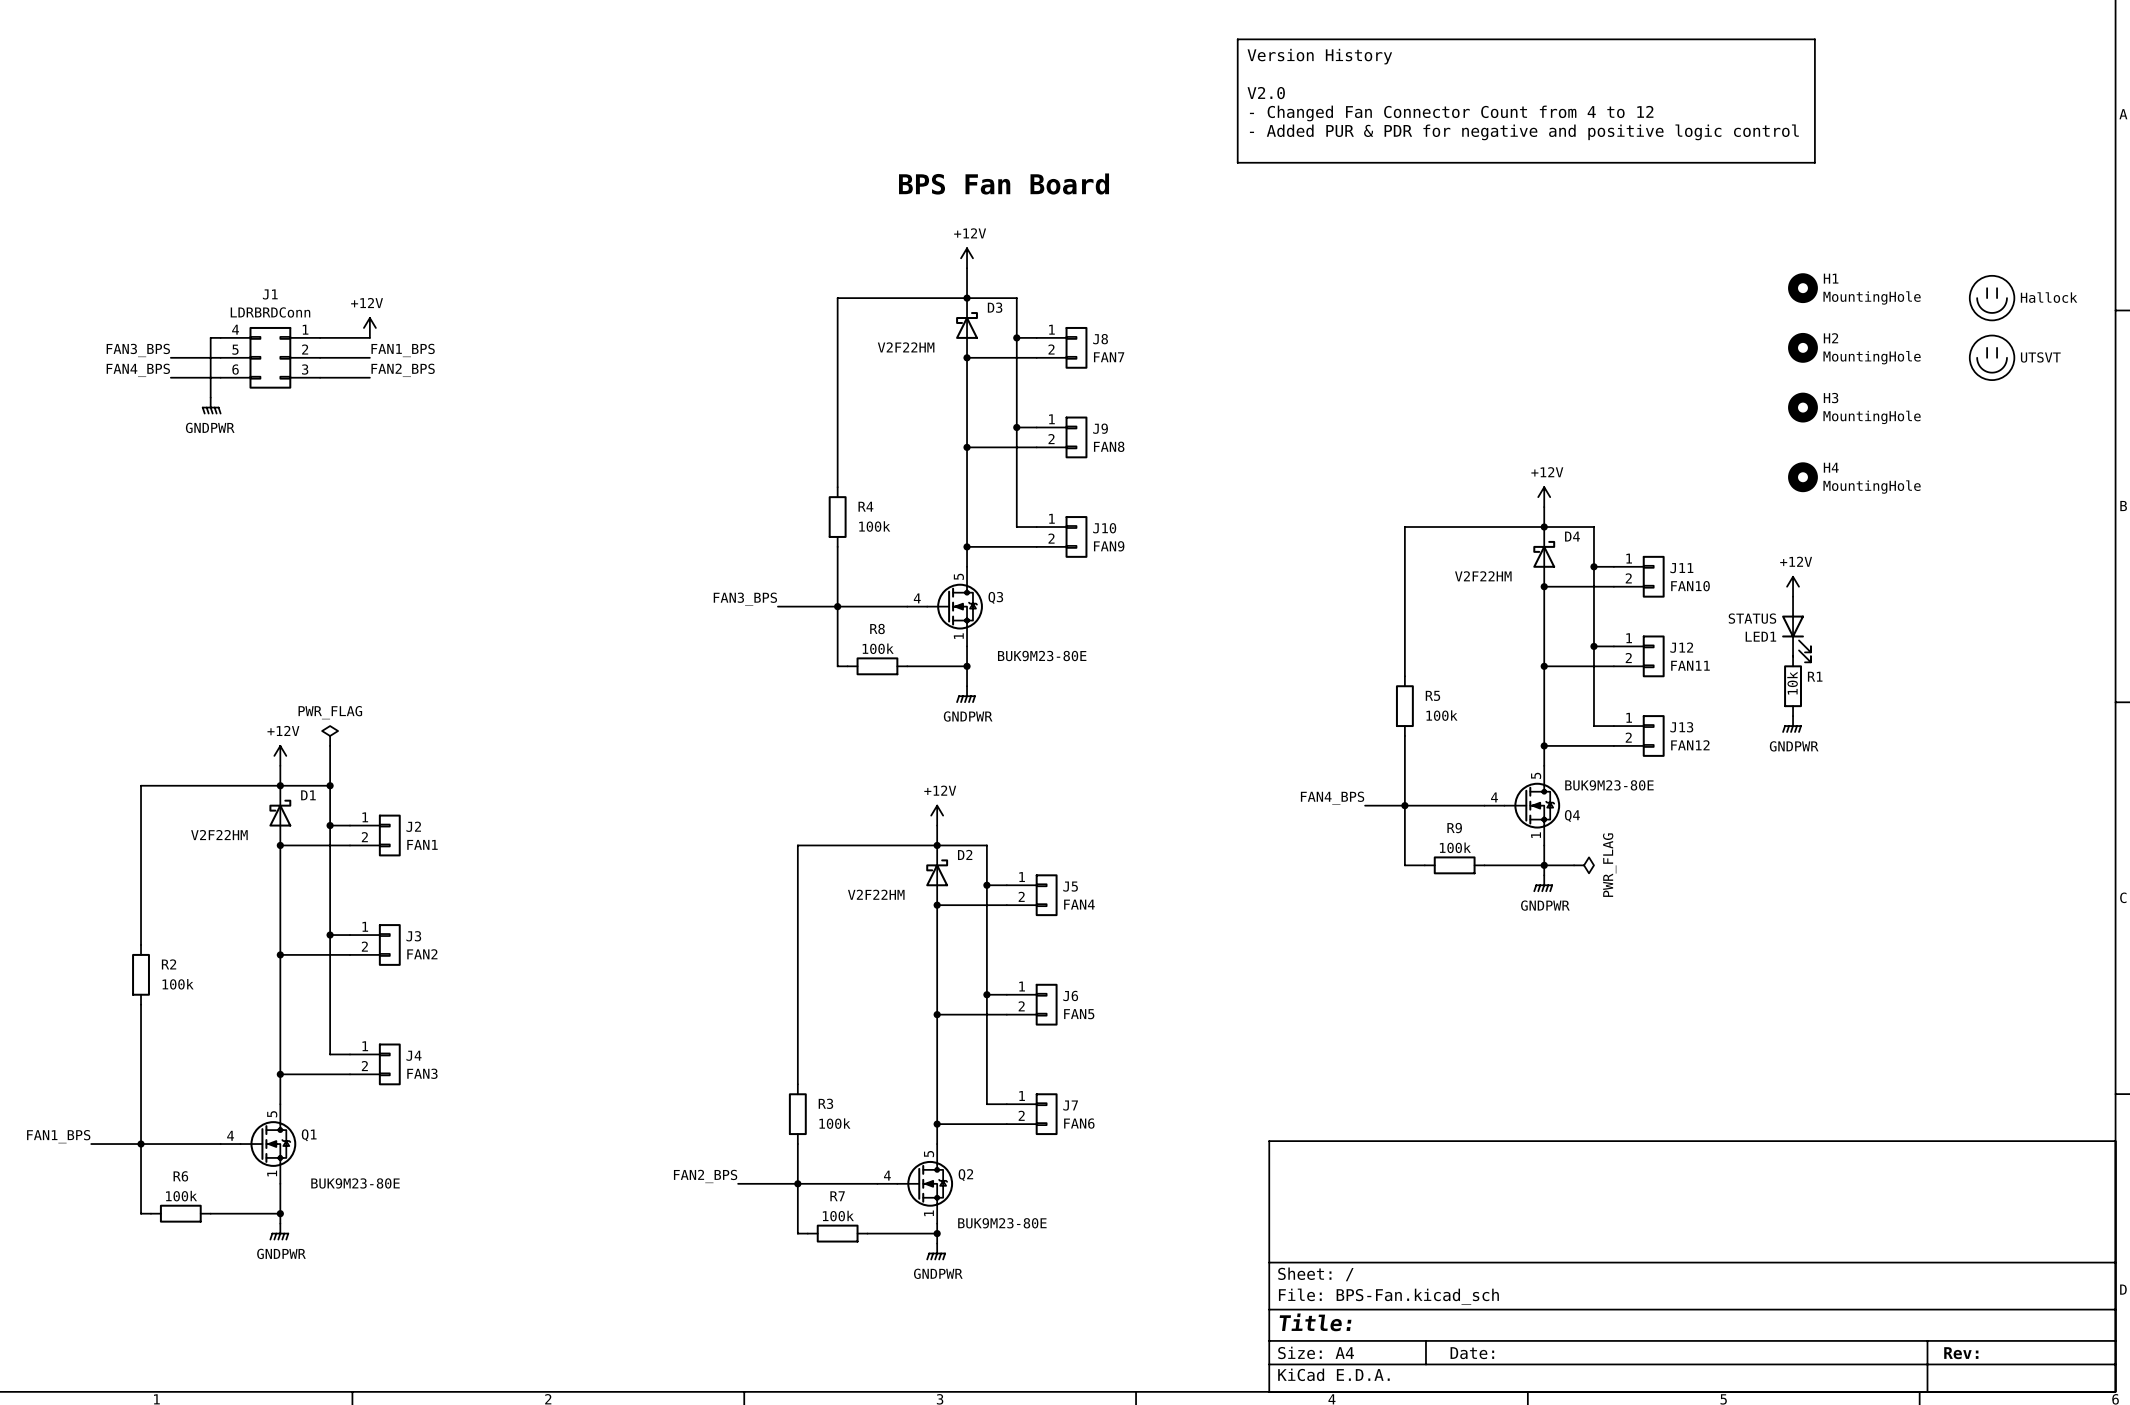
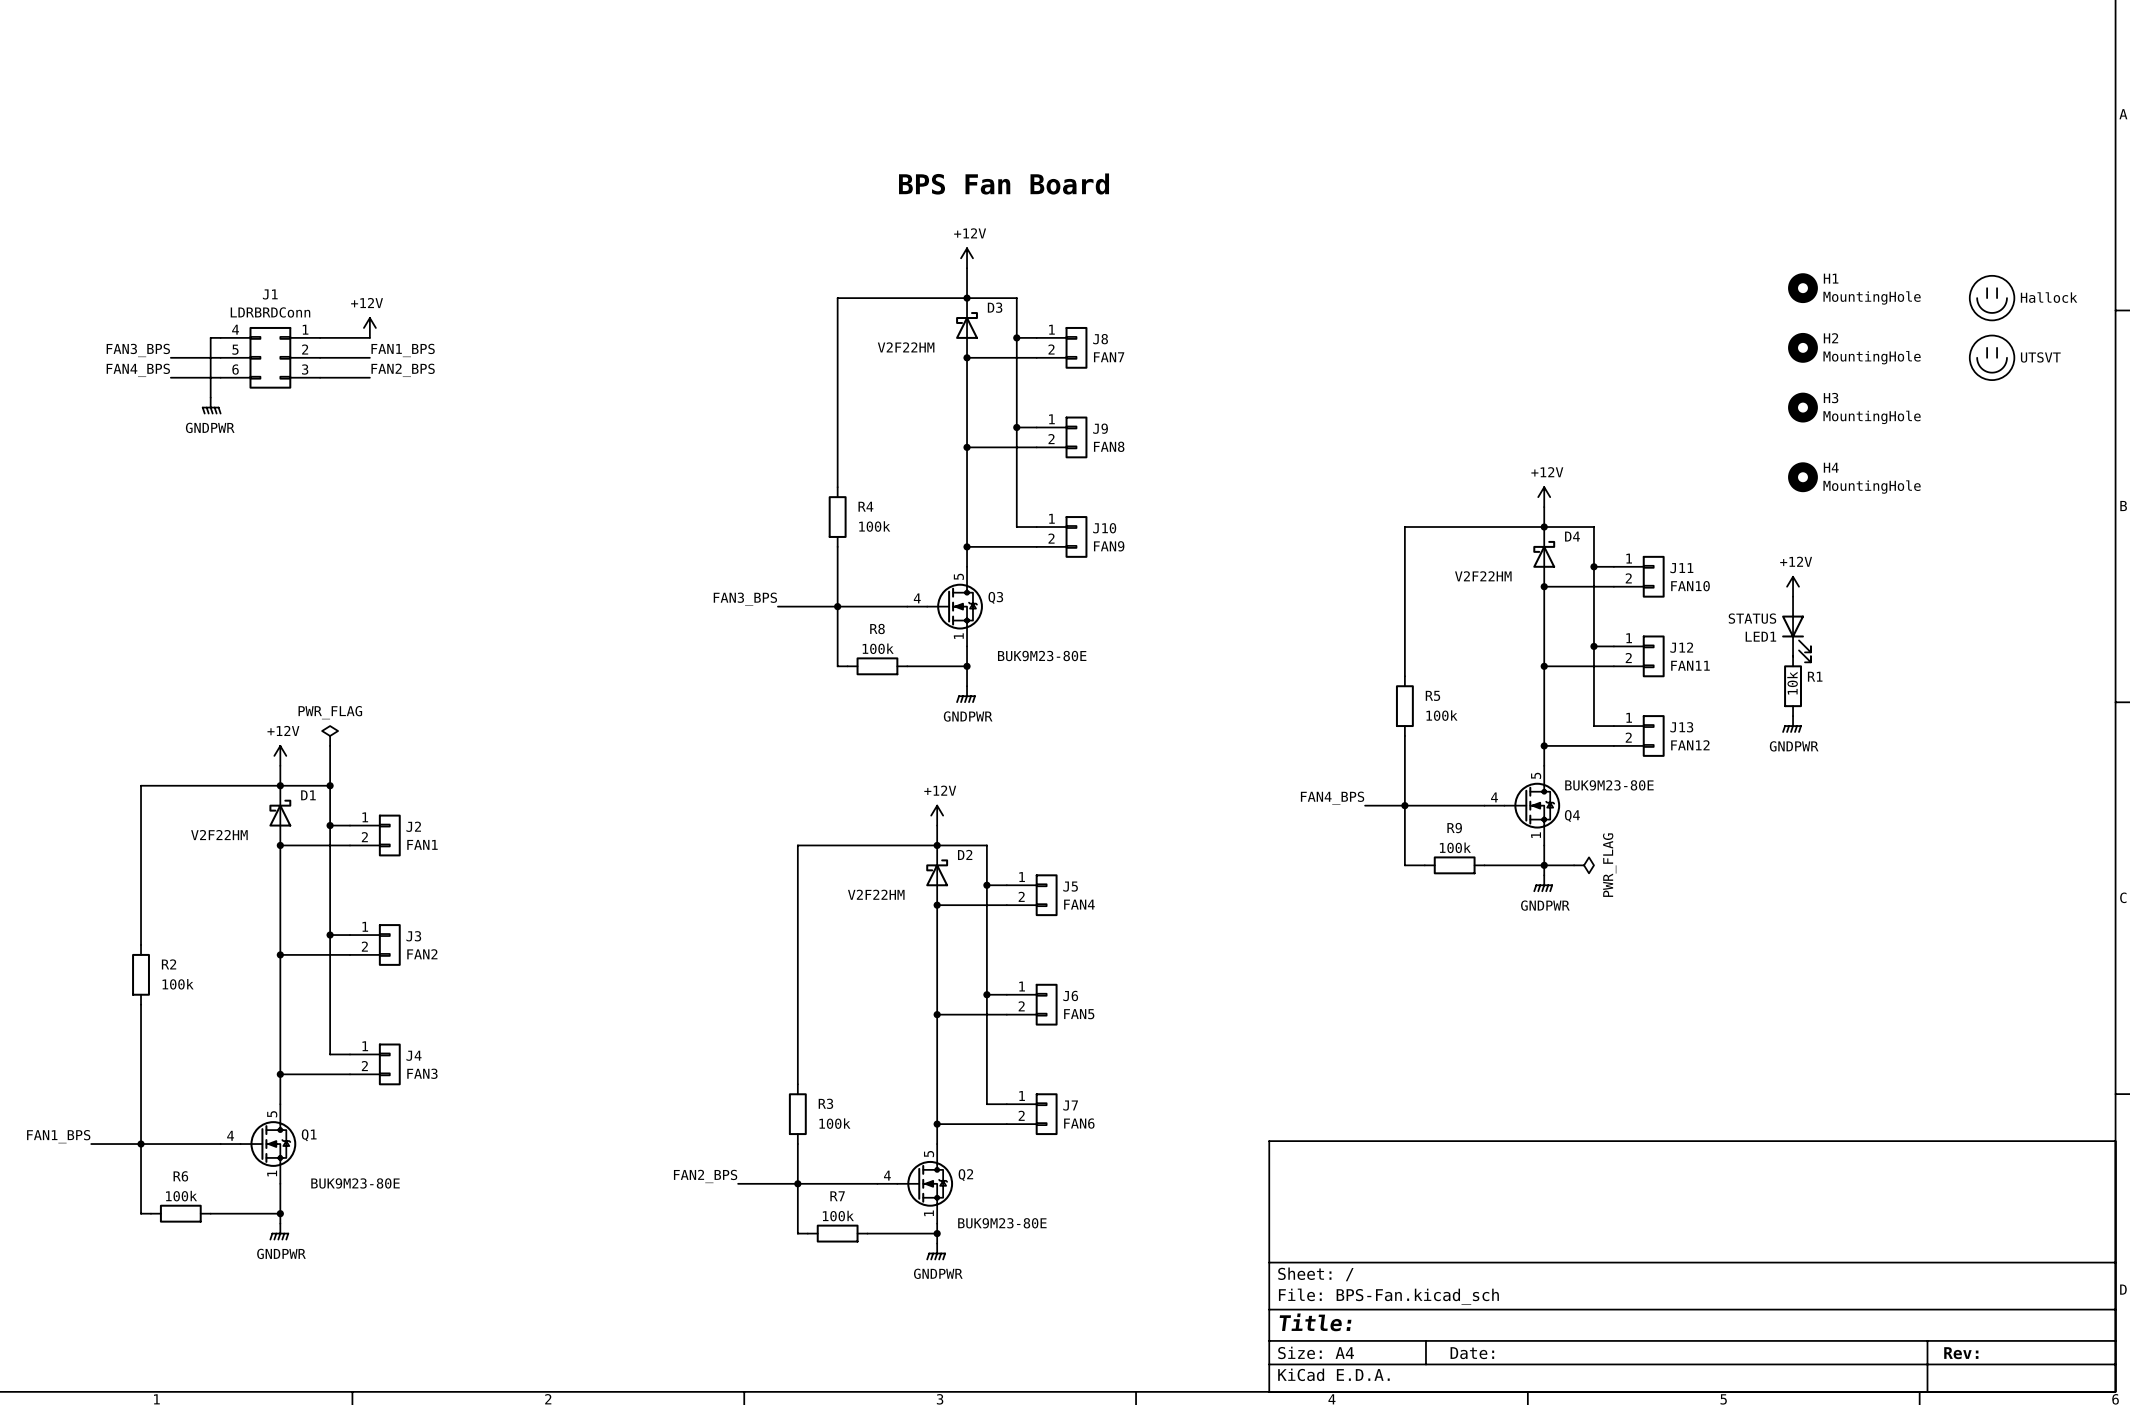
line: (1237, 39) (1814, 39) (1814, 162) (1237, 162) (1237, 39) -> none
text: Version History (1319, 56) -> none
text: V2.0 (1266, 93) -> none
text: - Changed Fan Connector Count from 4 to 12 (1451, 113) -> none
text: - Added PUR & PDR for negative and positive logic control (1524, 132) -> none

